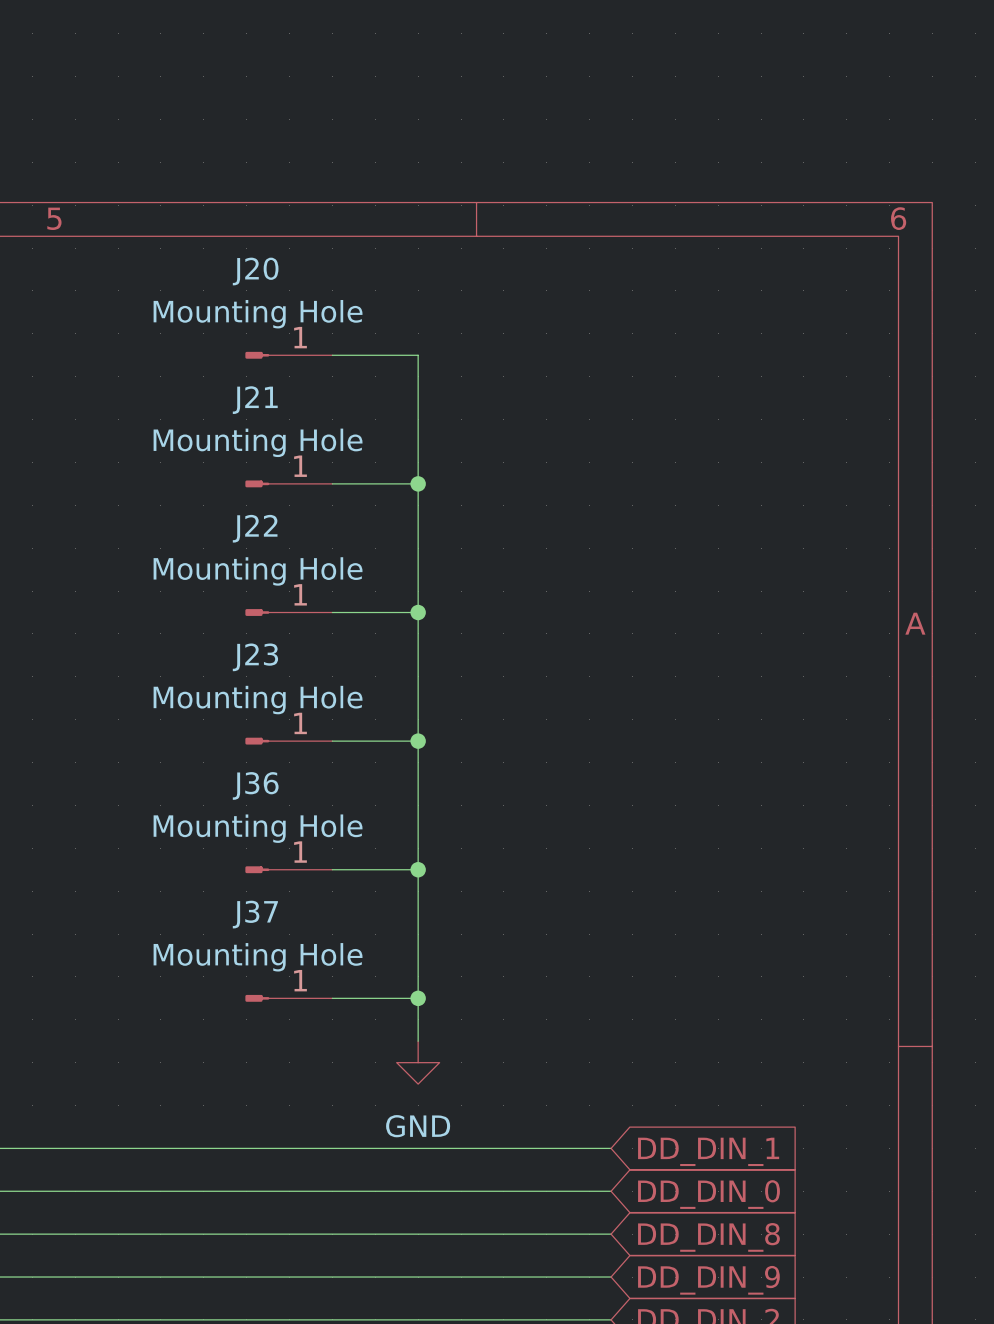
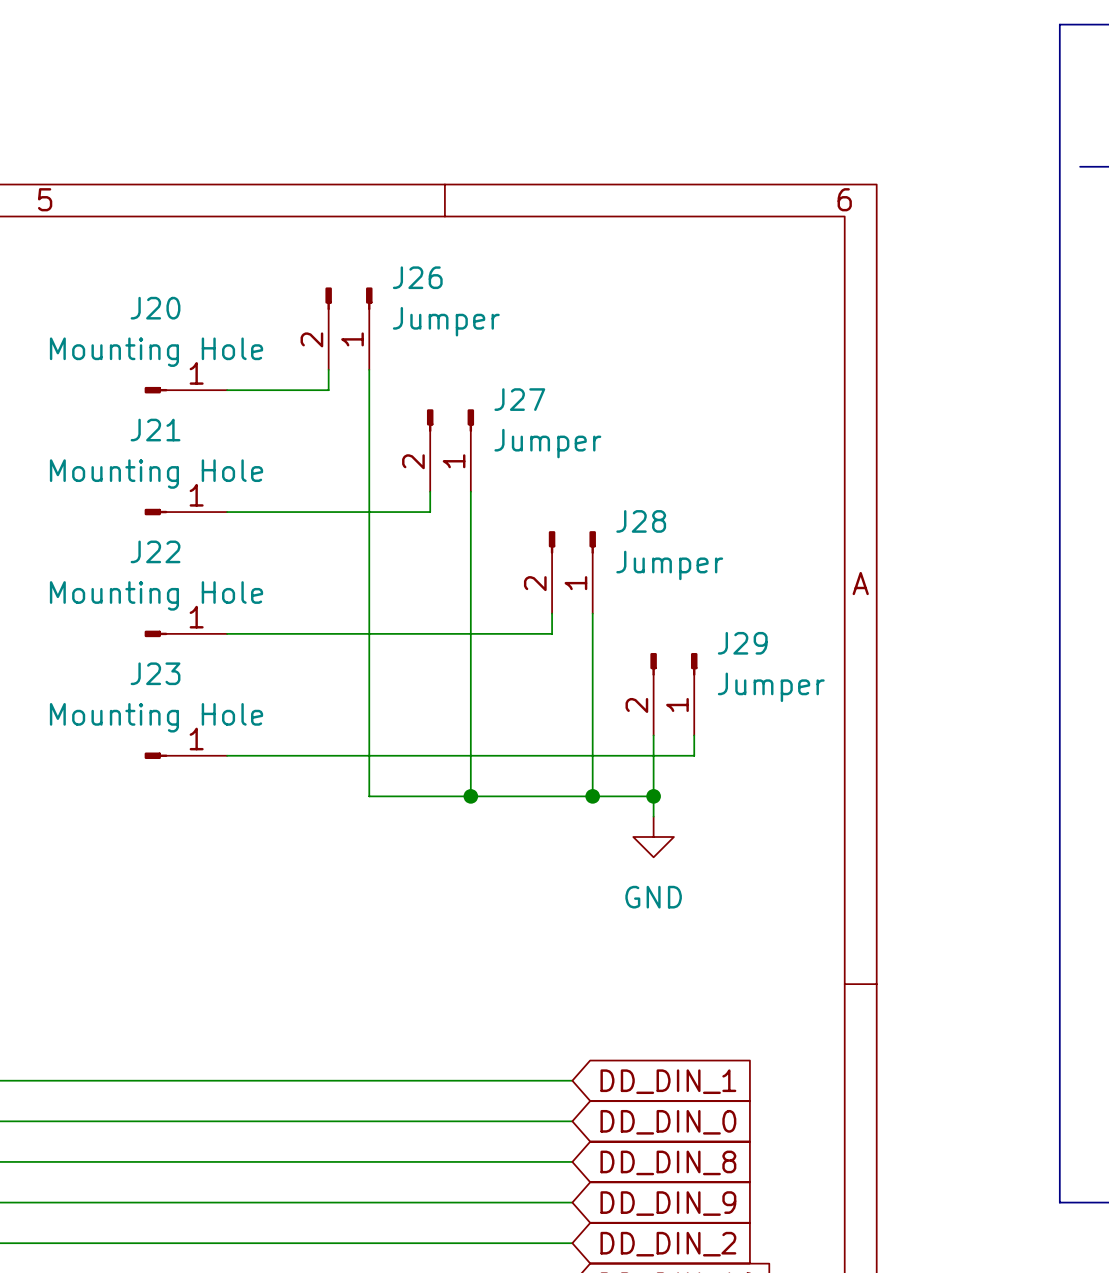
J26: none -> Jumper (348, 328)
J20 position: (288, 355) -> (185, 390)
wire: (332, 355) (418, 355) (418, 1041) -> none
wire: none -> (328, 369) (328, 390) (227, 390)
wire: none -> (369, 369) (369, 796) (653, 796)
J21 position: (288, 483) -> (185, 512)
wire: (332, 483) (418, 483) -> none
junction: (418, 483) -> none
J27: none -> Jumper (450, 450)
wire: none -> (430, 491) (430, 512) (227, 512)
wire: none -> (470, 491) (470, 796)
J28: none -> Jumper (572, 572)
J22 position: (288, 612) -> (185, 633)
wire: (332, 612) (418, 612) -> none
junction: (418, 612) -> none
wire: none -> (552, 613) (552, 633) (227, 633)
wire: none -> (592, 613) (592, 796)
J29: none -> Jumper (673, 694)
J23 position: (288, 741) -> (185, 755)
wire: (332, 741) (418, 741) -> none
junction: (418, 741) -> none
wire: none -> (653, 735) (653, 816)
wire: none -> (694, 735) (694, 755) (227, 755)
junction: none -> (470, 796)
junction: none -> (592, 796)
junction: none -> (653, 796)
J36: Mounting Hole (288, 869) -> none
wire: (332, 869) (418, 869) -> none
junction: (418, 869) -> none
J37: Mounting Hole (288, 998) -> none
wire: (332, 998) (418, 998) -> none
junction: (418, 998) -> none
power symbol position: GND (418, 1062) -> GND (653, 837)

